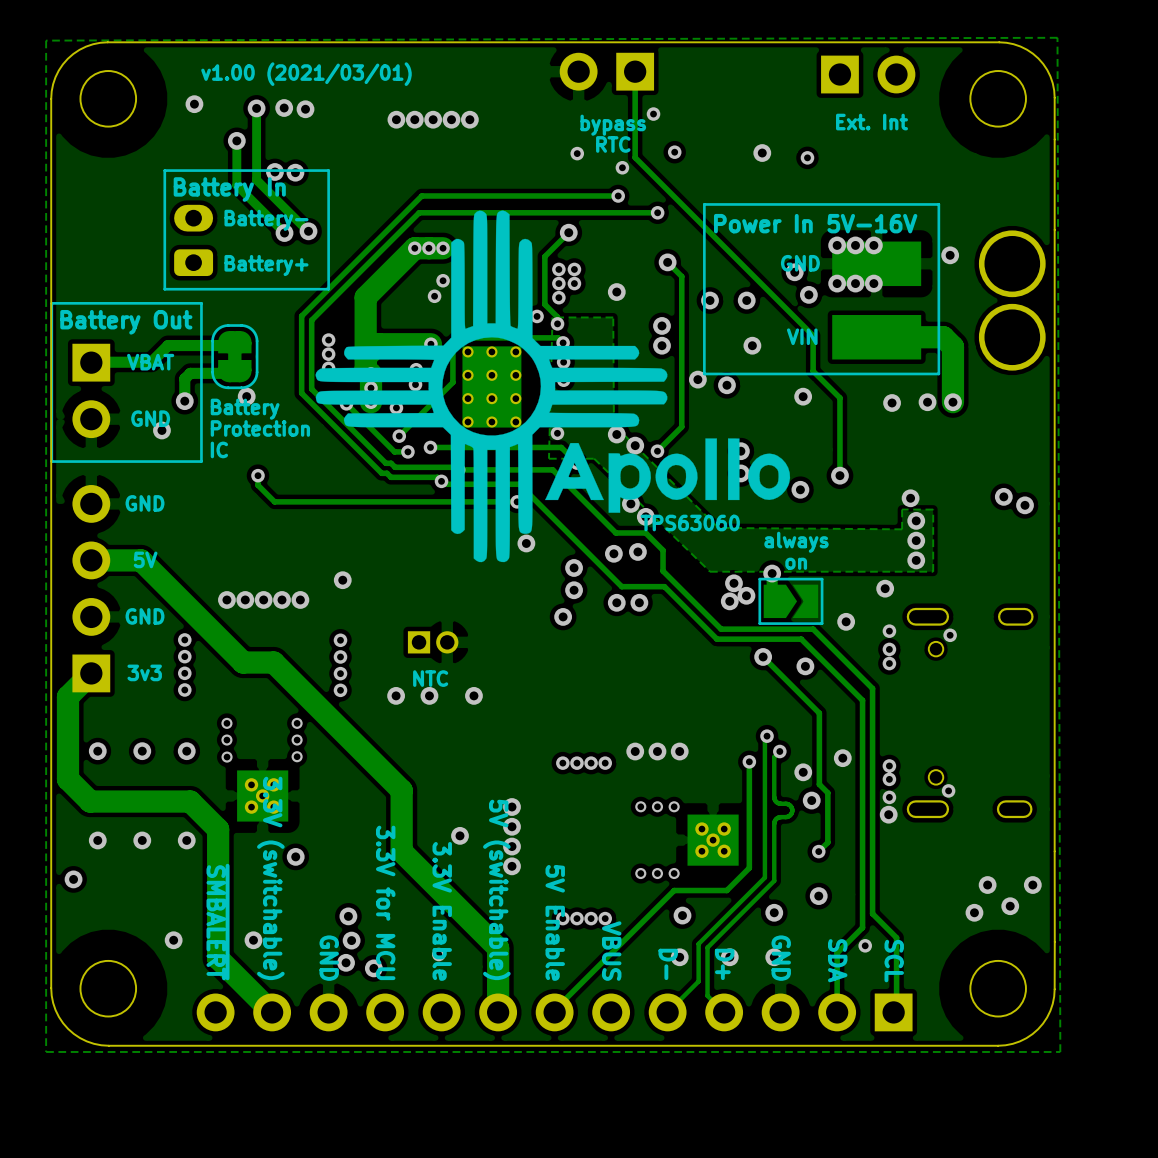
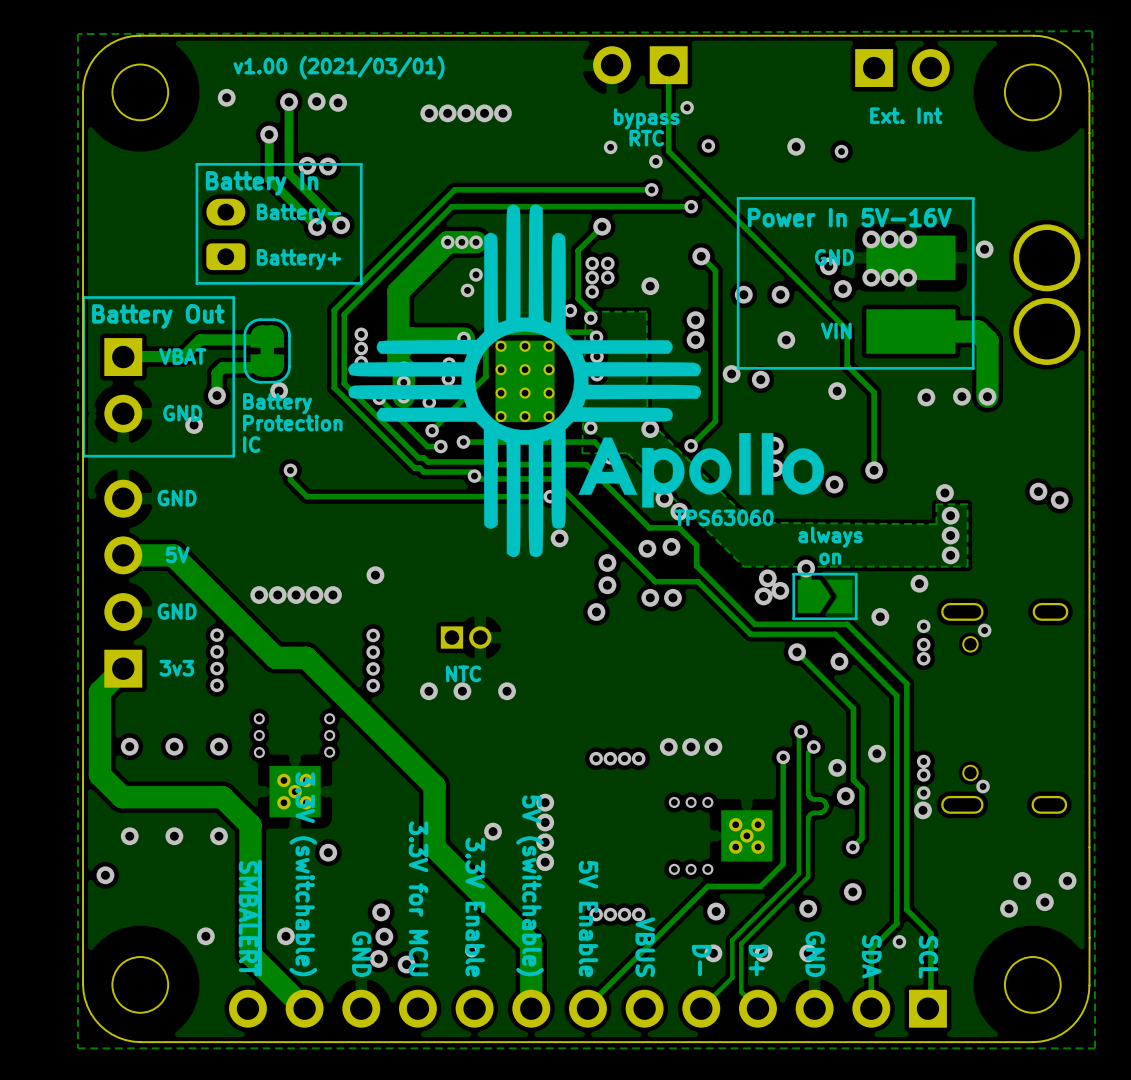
via: (635, 445) -> none

